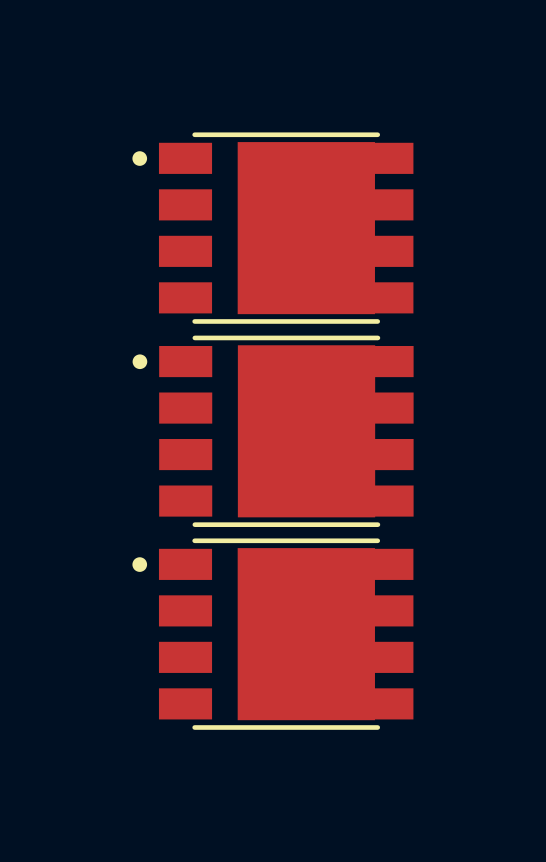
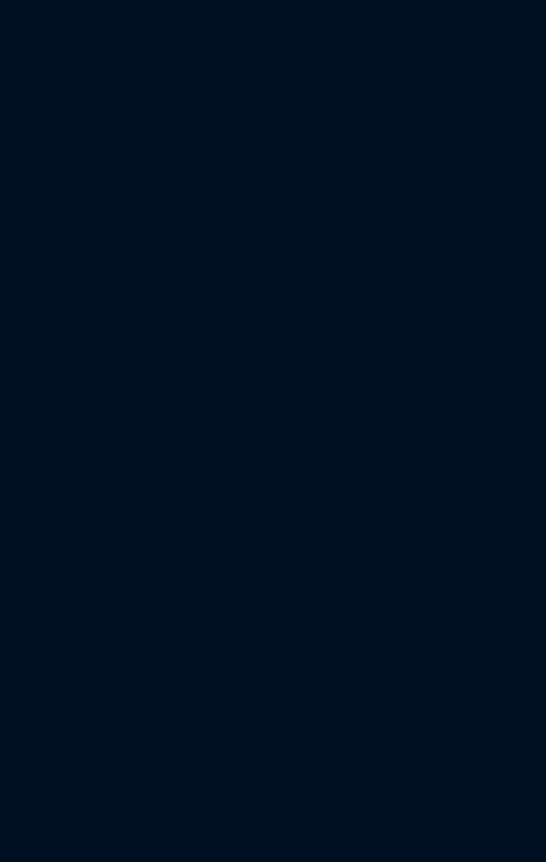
part: (272, 228) -> none
part: (273, 431) -> none
part: (272, 634) -> none

